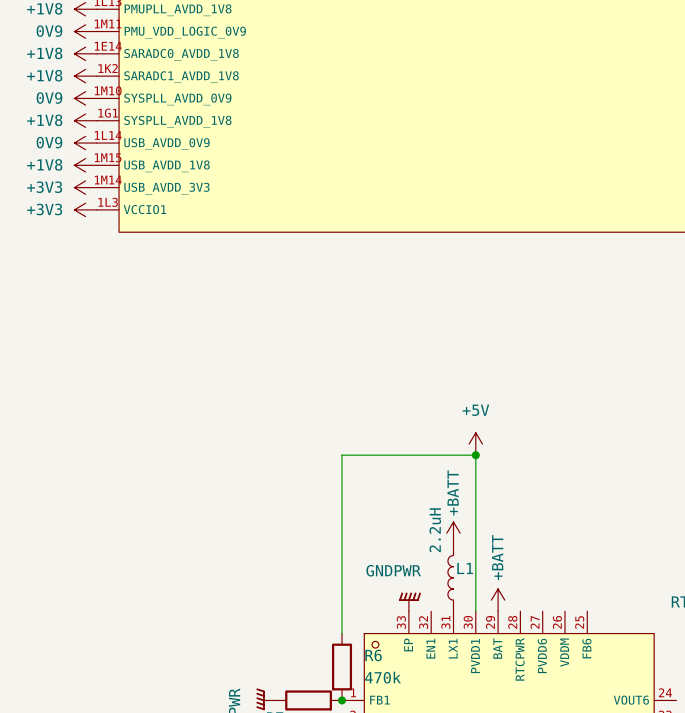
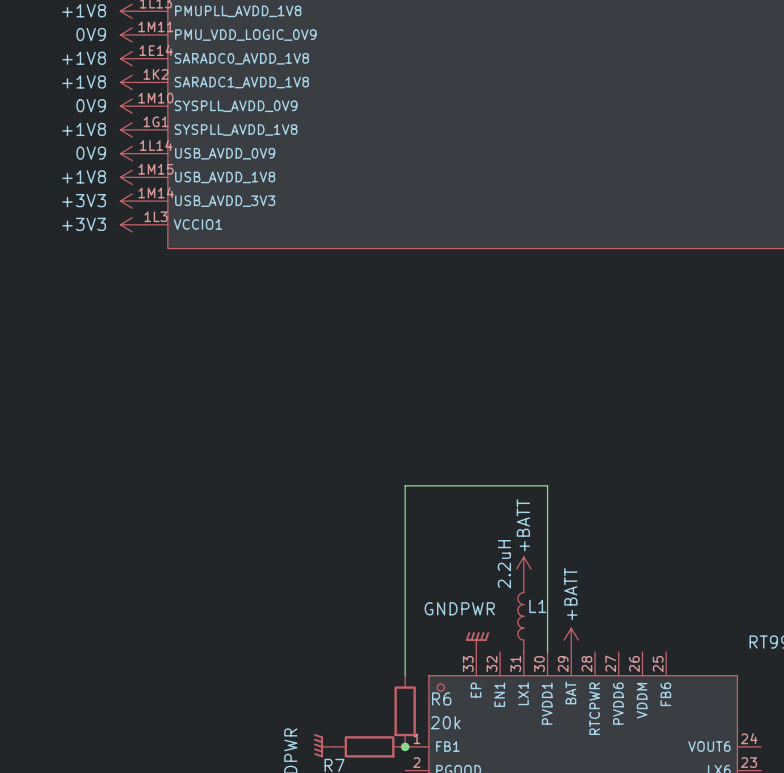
power symbol: +5V (475, 444) -> none
junction: (475, 455) -> none
R6 value: 470k (382, 677) -> 20k (445, 722)

